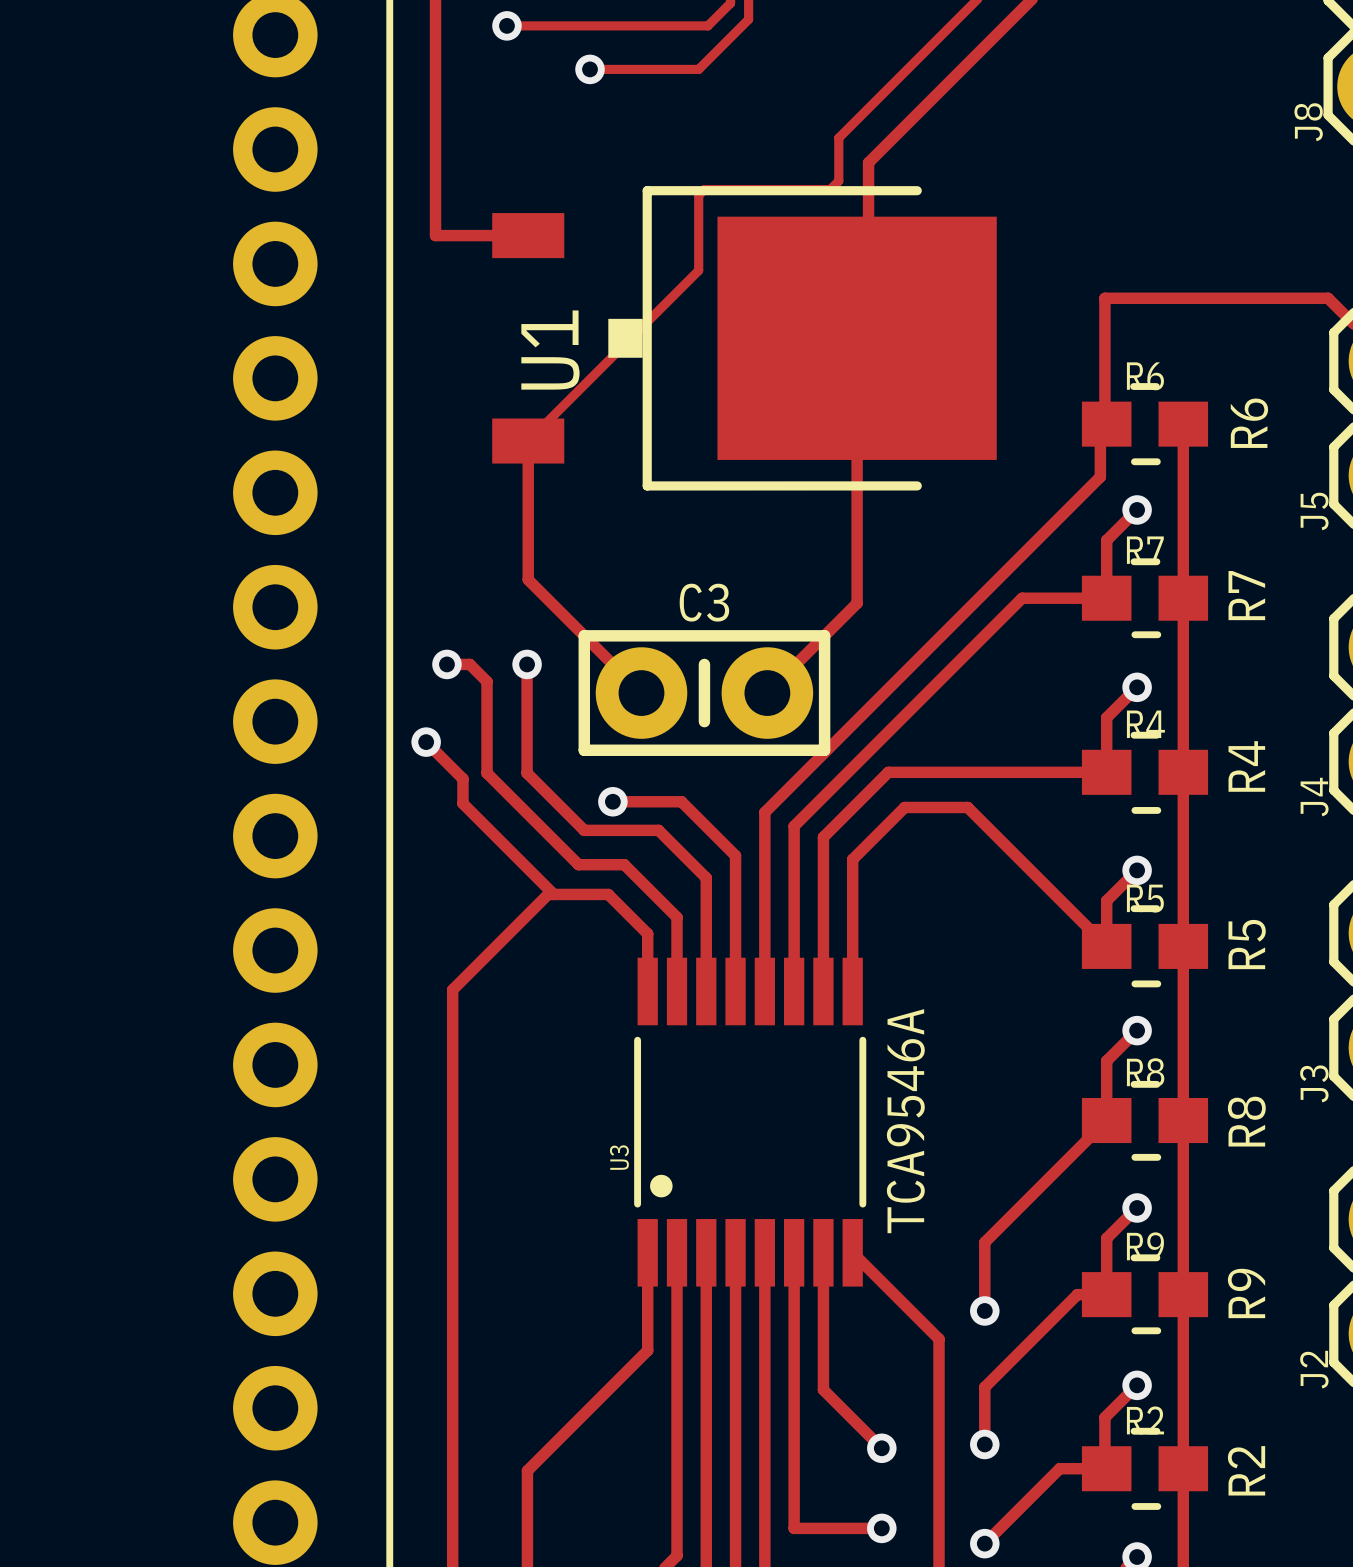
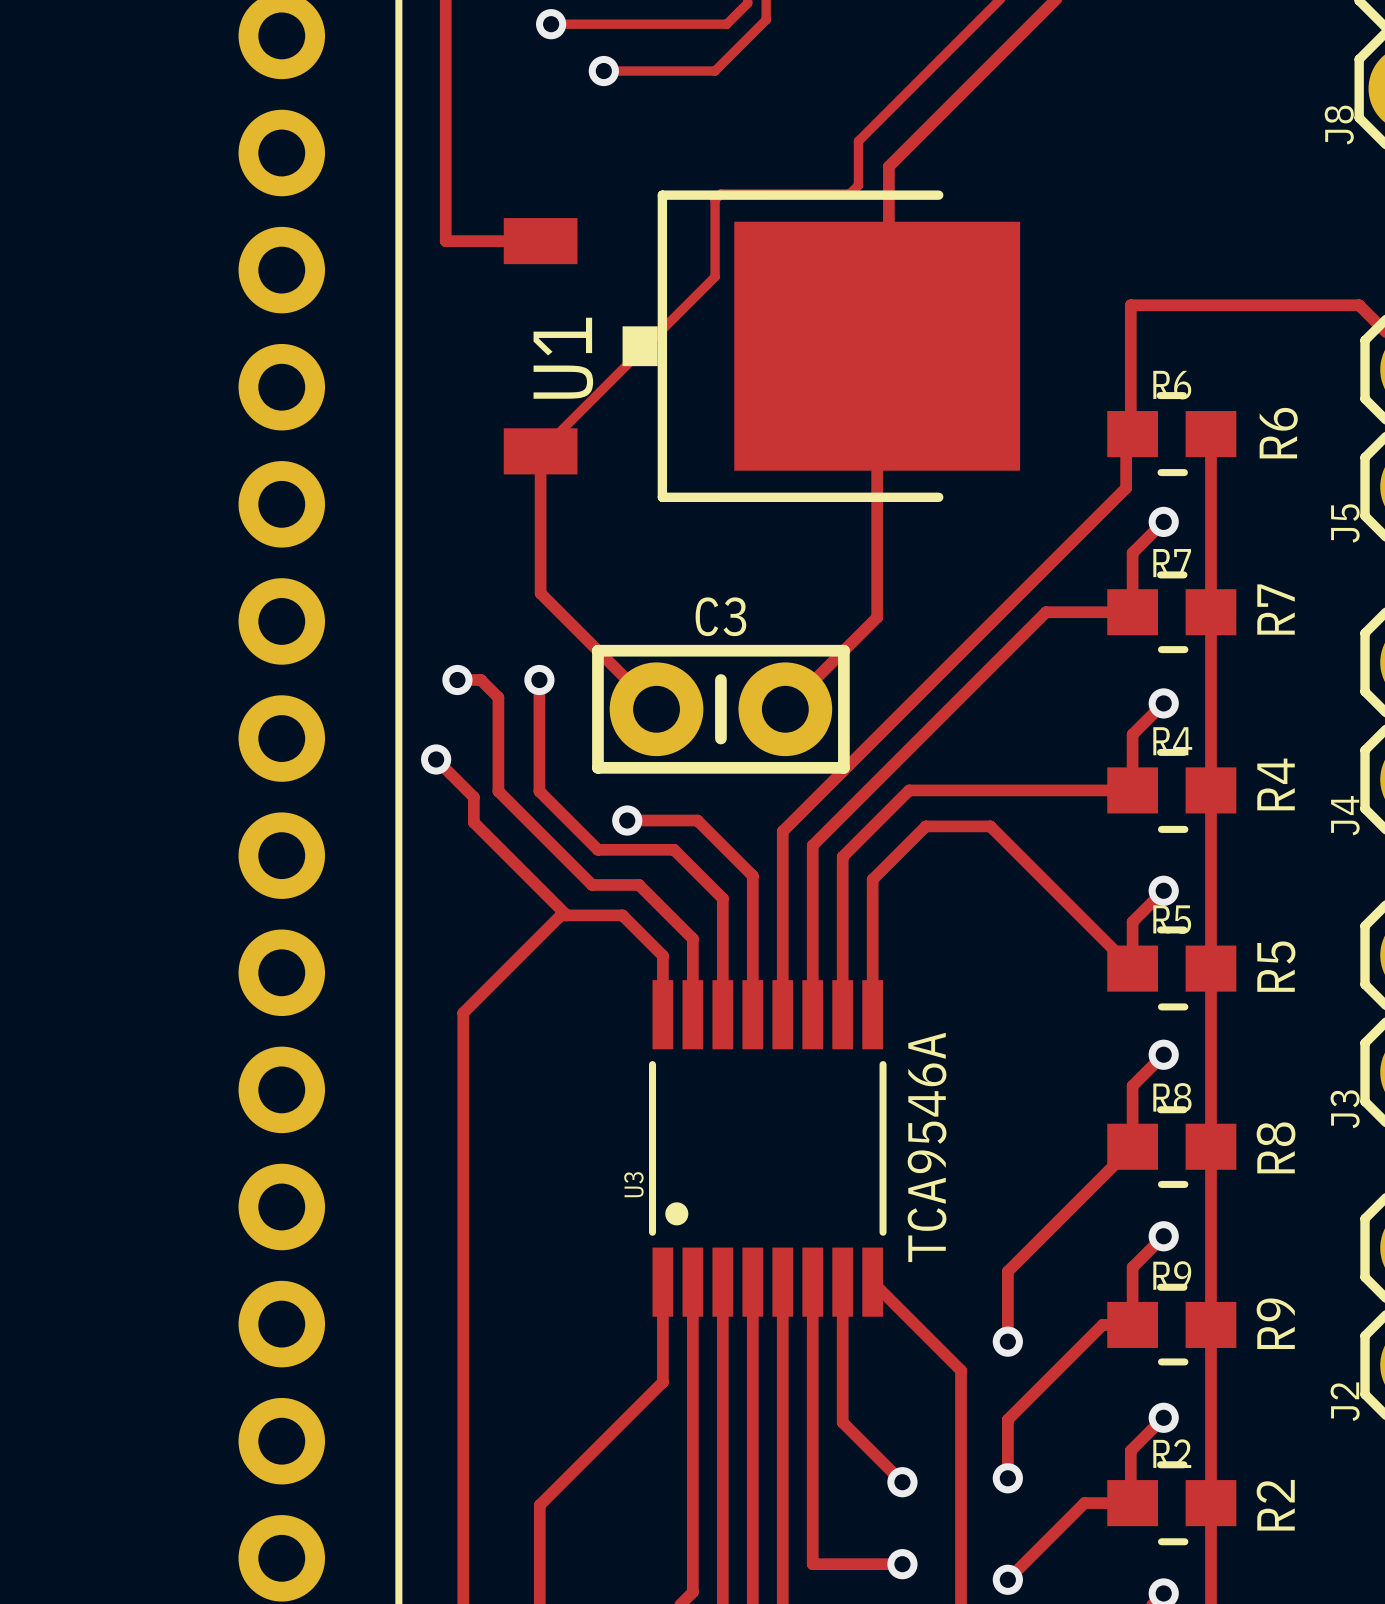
track: (710, 23) (707, 25) (506, 25) -> (726, 24) (551, 24)
via position: (506, 25) -> (551, 24)

